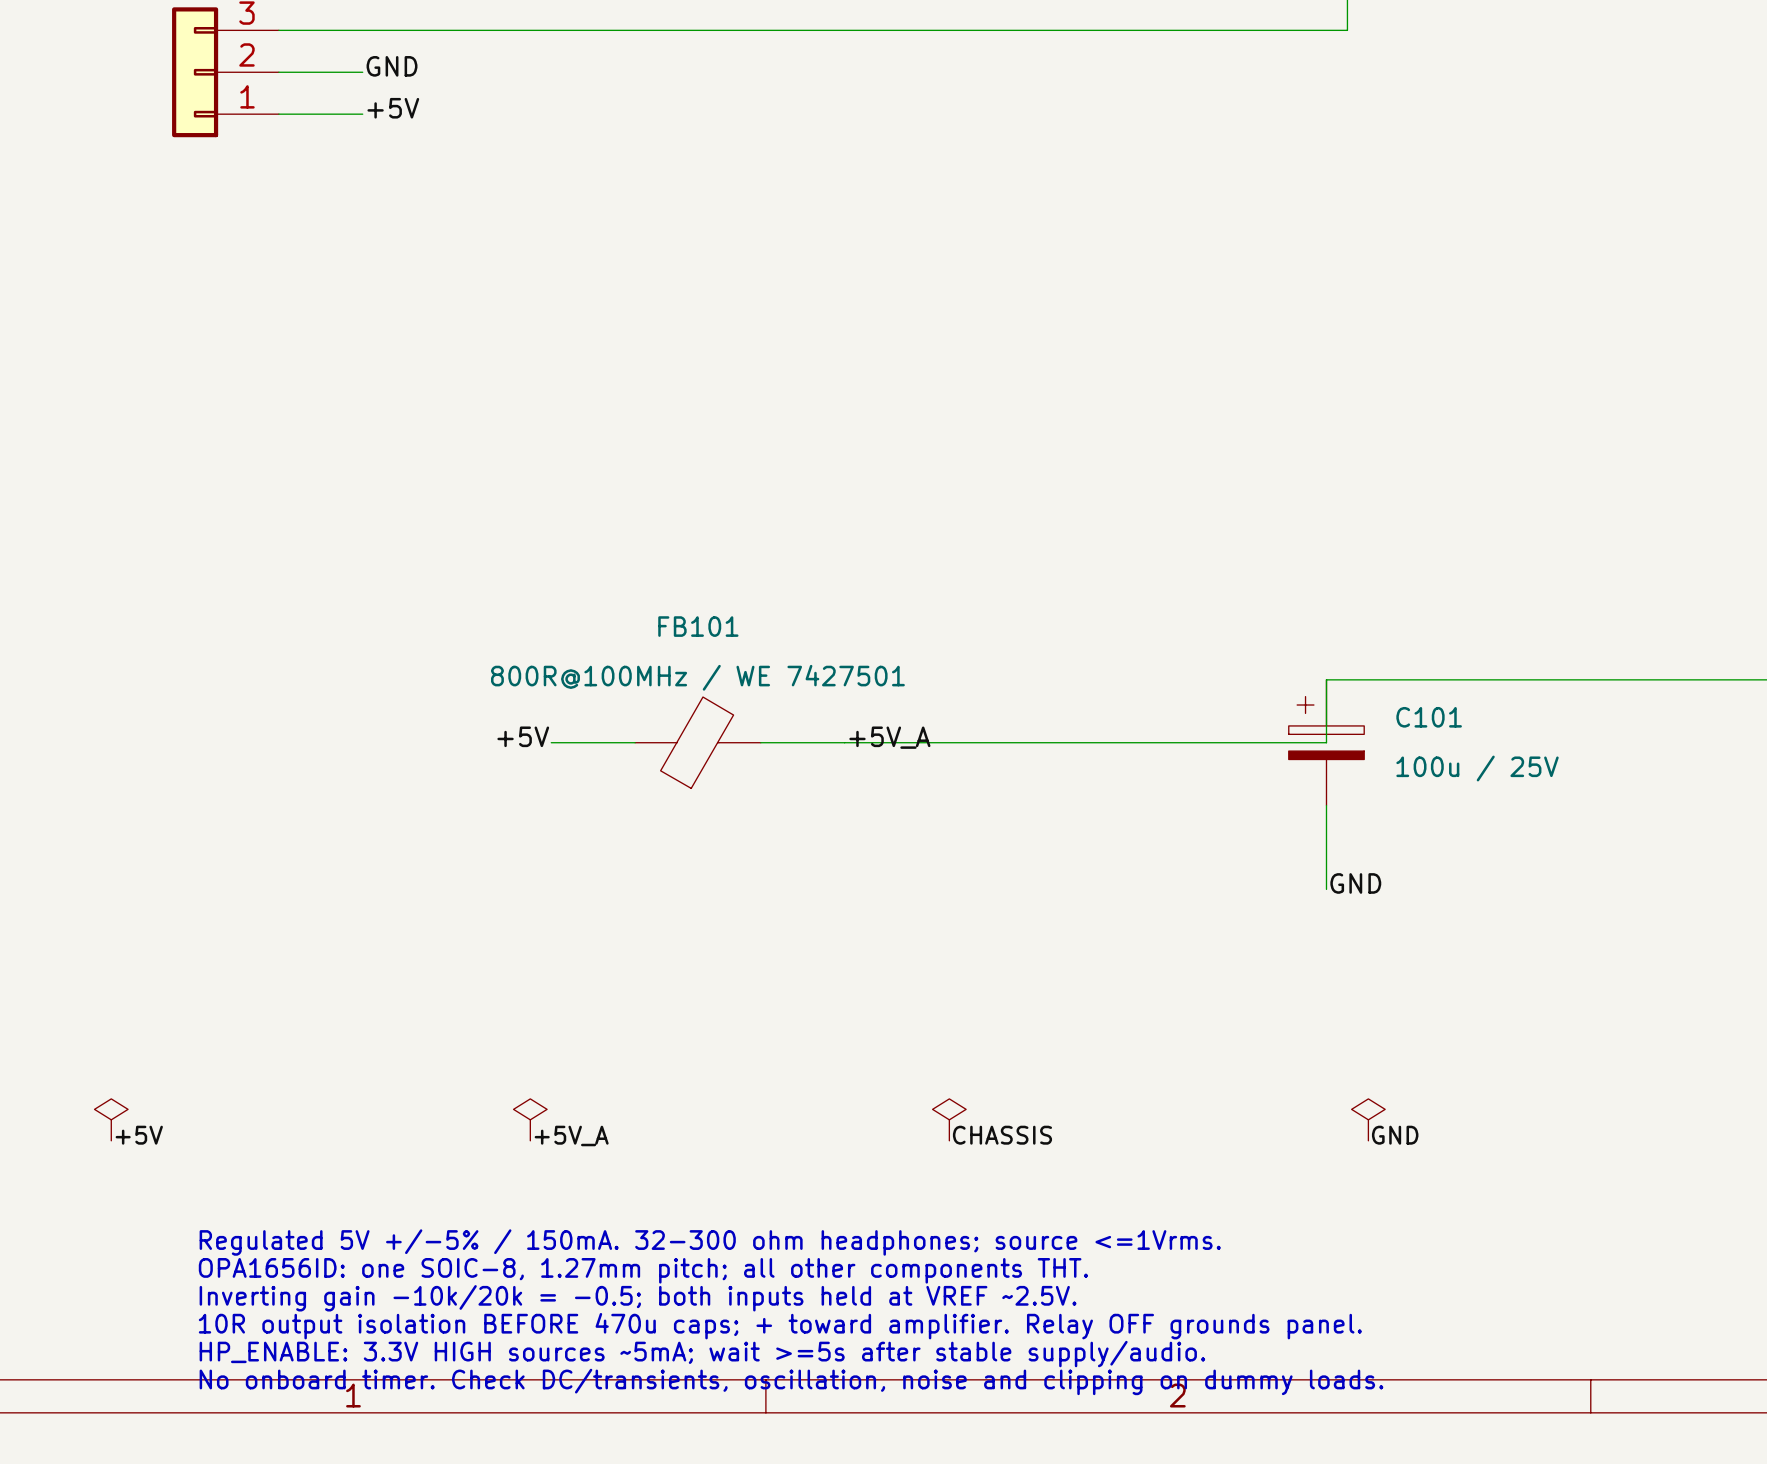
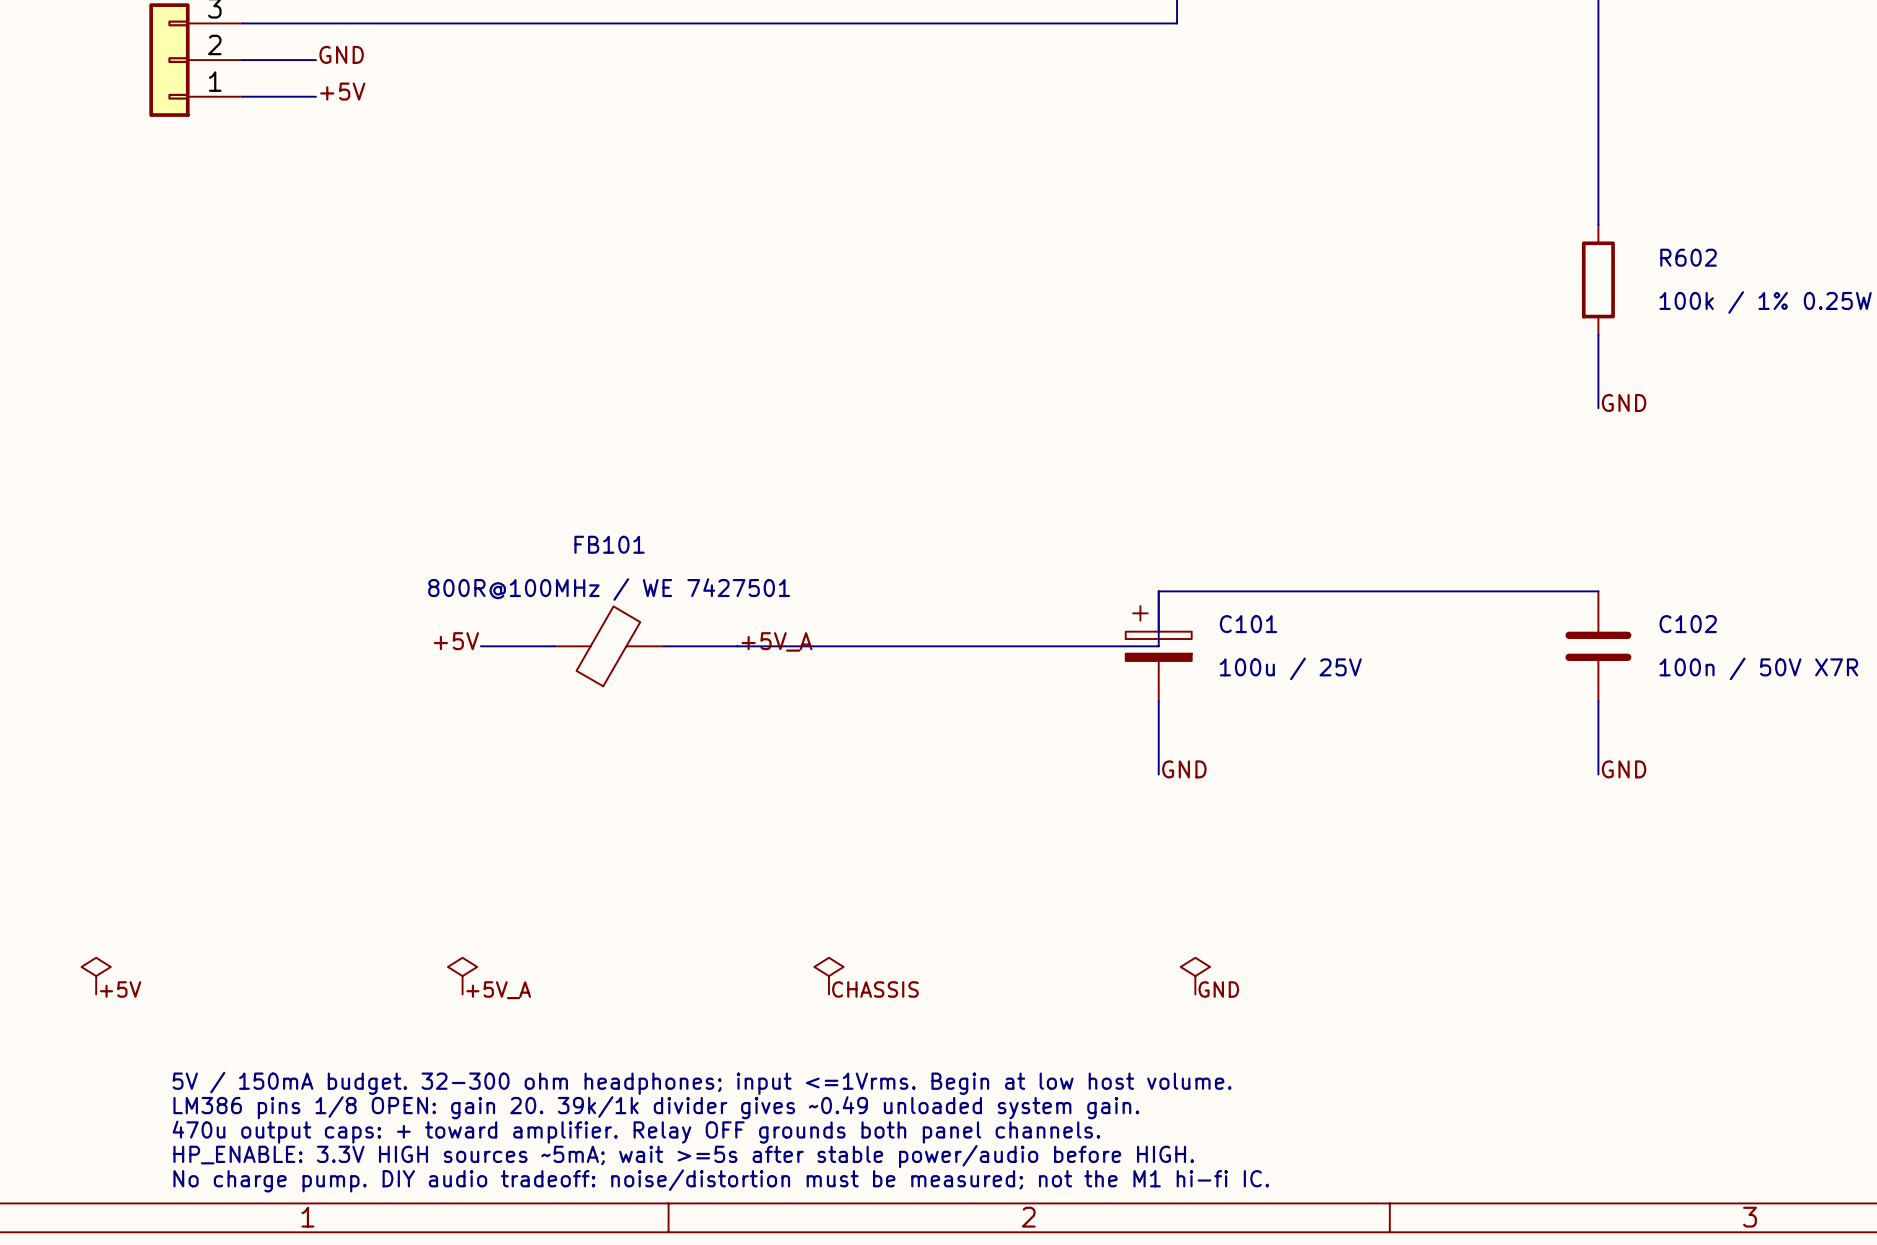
text: Regulated 5V +/-5% / 150mA. 32-300 ohm headphones; source <=1Vrms. (710, 1242) -> 5V / 150mA budget. 32-300 ohm headphones; input <=1Vrms. Begin at low host volume. (702, 1083)
text: OPA1656ID: one SOIC-8, 1.27mm pitch; all other components THT. (643, 1270) -> LM386 pins 1/8 OPEN: gain 20. 39k/1k divider gives ~0.49 unloaded system gain. (656, 1107)
text: Inverting gain -10k/20k = -0.5; both inputs held at VREF ~2.5V. (638, 1298) -> 470u output caps: + toward amplifier. Relay OFF grounds both panel channels. (636, 1132)
text: 10R output isolation BEFORE 470u caps; + toward amplifier. Relay OFF grounds panel. (780, 1326) -> HP_ENABLE: 3.3V HIGH sources ~5mA; wait >=5s after stable power/audio before HIGH. (683, 1156)
text: HP_ENABLE: 3.3V HIGH sources ~5mA; wait >=5s after stable supply/audio. (702, 1354) -> No charge pump. DIY audio tradeoff: noise/distortion must be measured; not the M1 hi-fi IC. (721, 1180)
text: No onboard timer. Check DC/transients, oscillation, noise and clipping on dummy loads. (791, 1381) -> none

